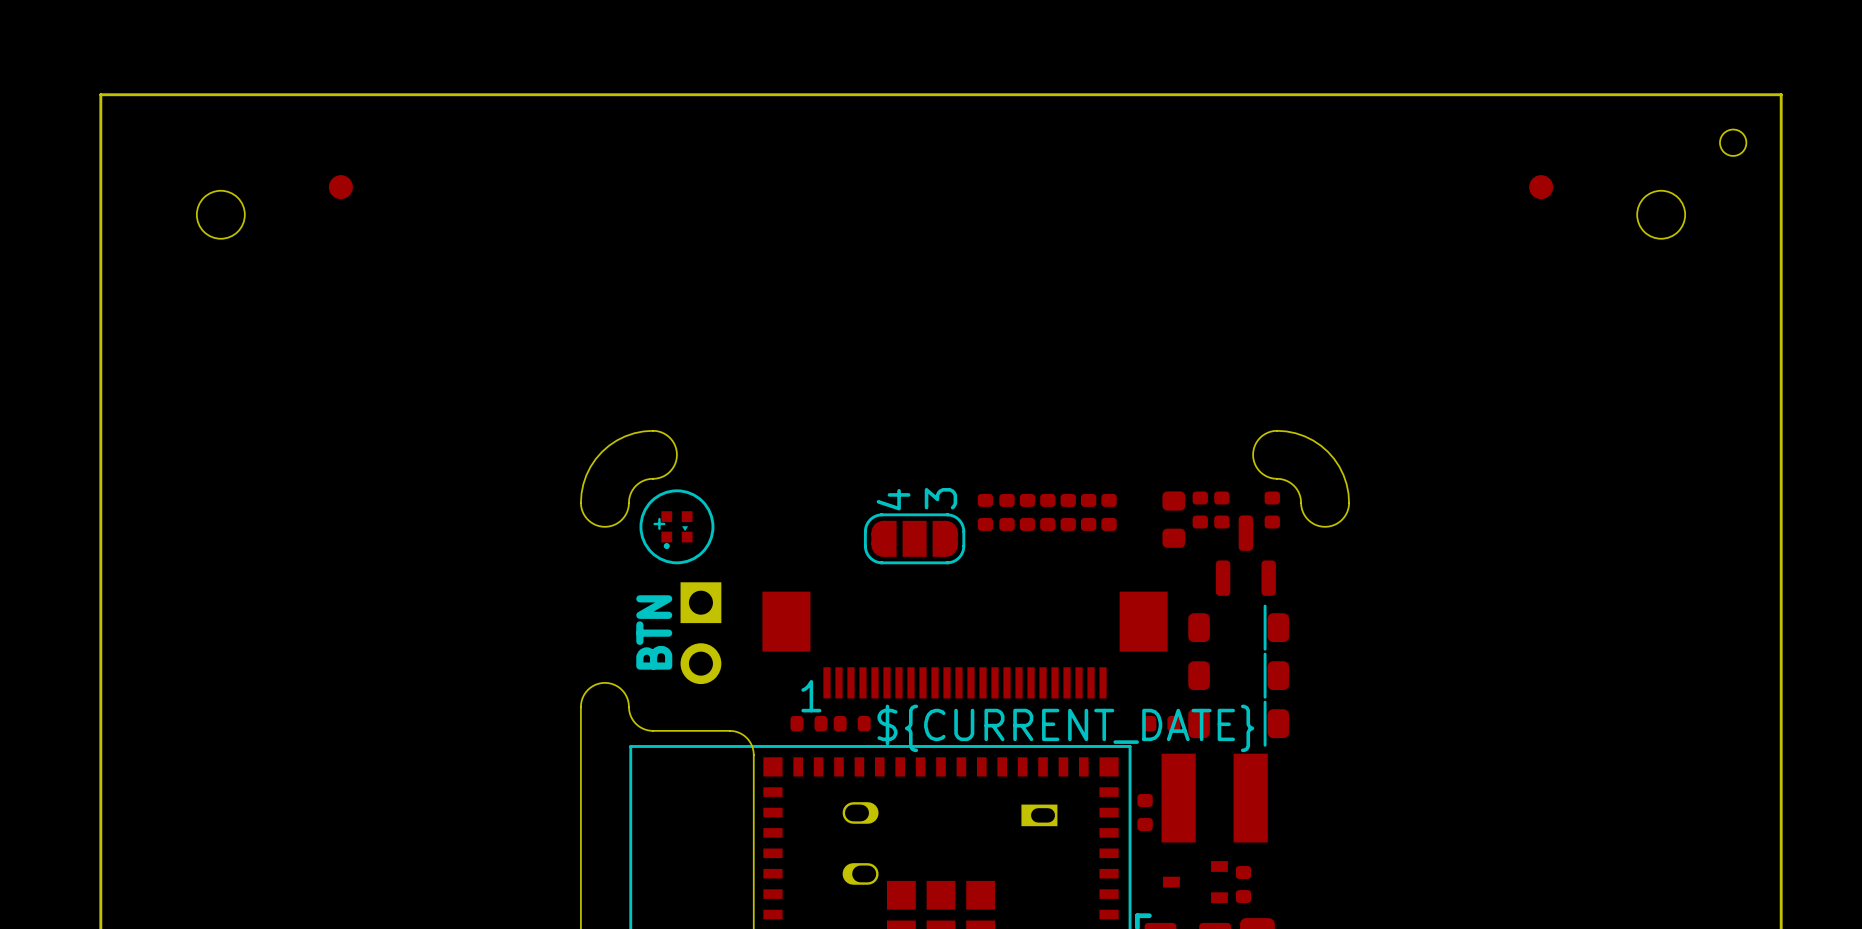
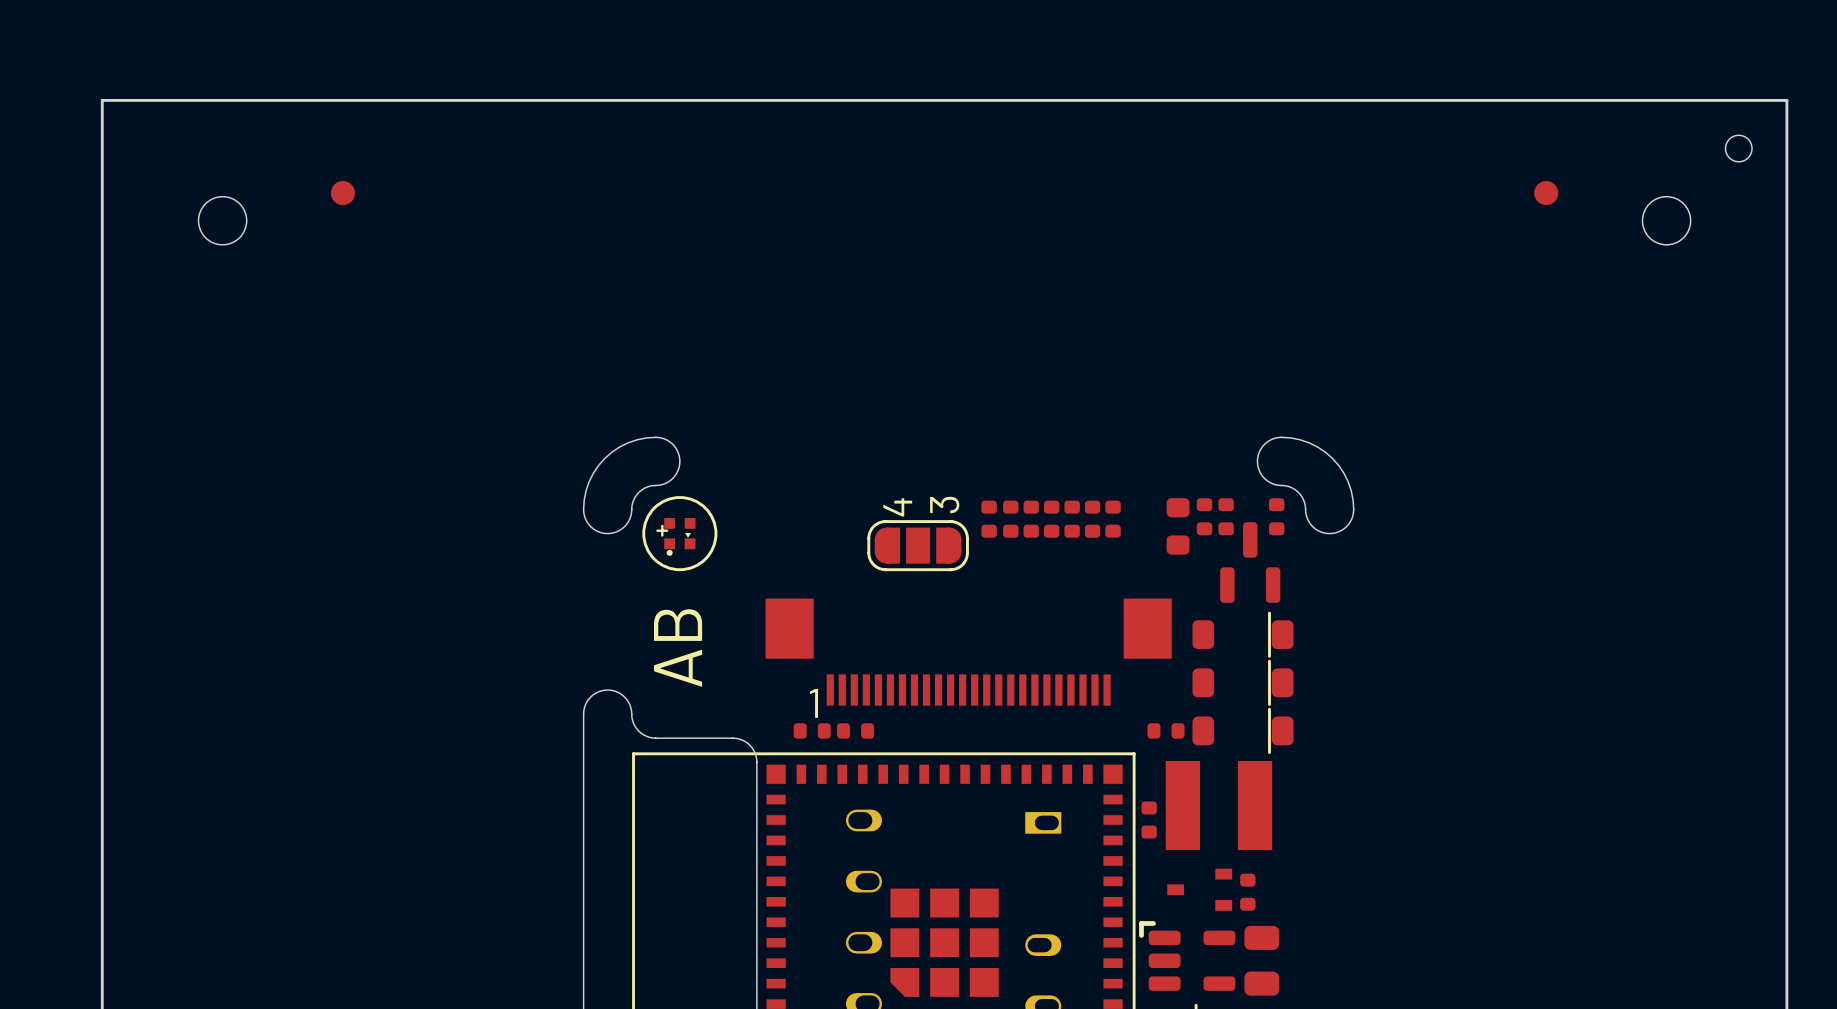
text: BTN (654, 632) -> AB (678, 648)
part: (700, 633) -> none
text: ${CURRENT_DATE} (1065, 728) -> none

